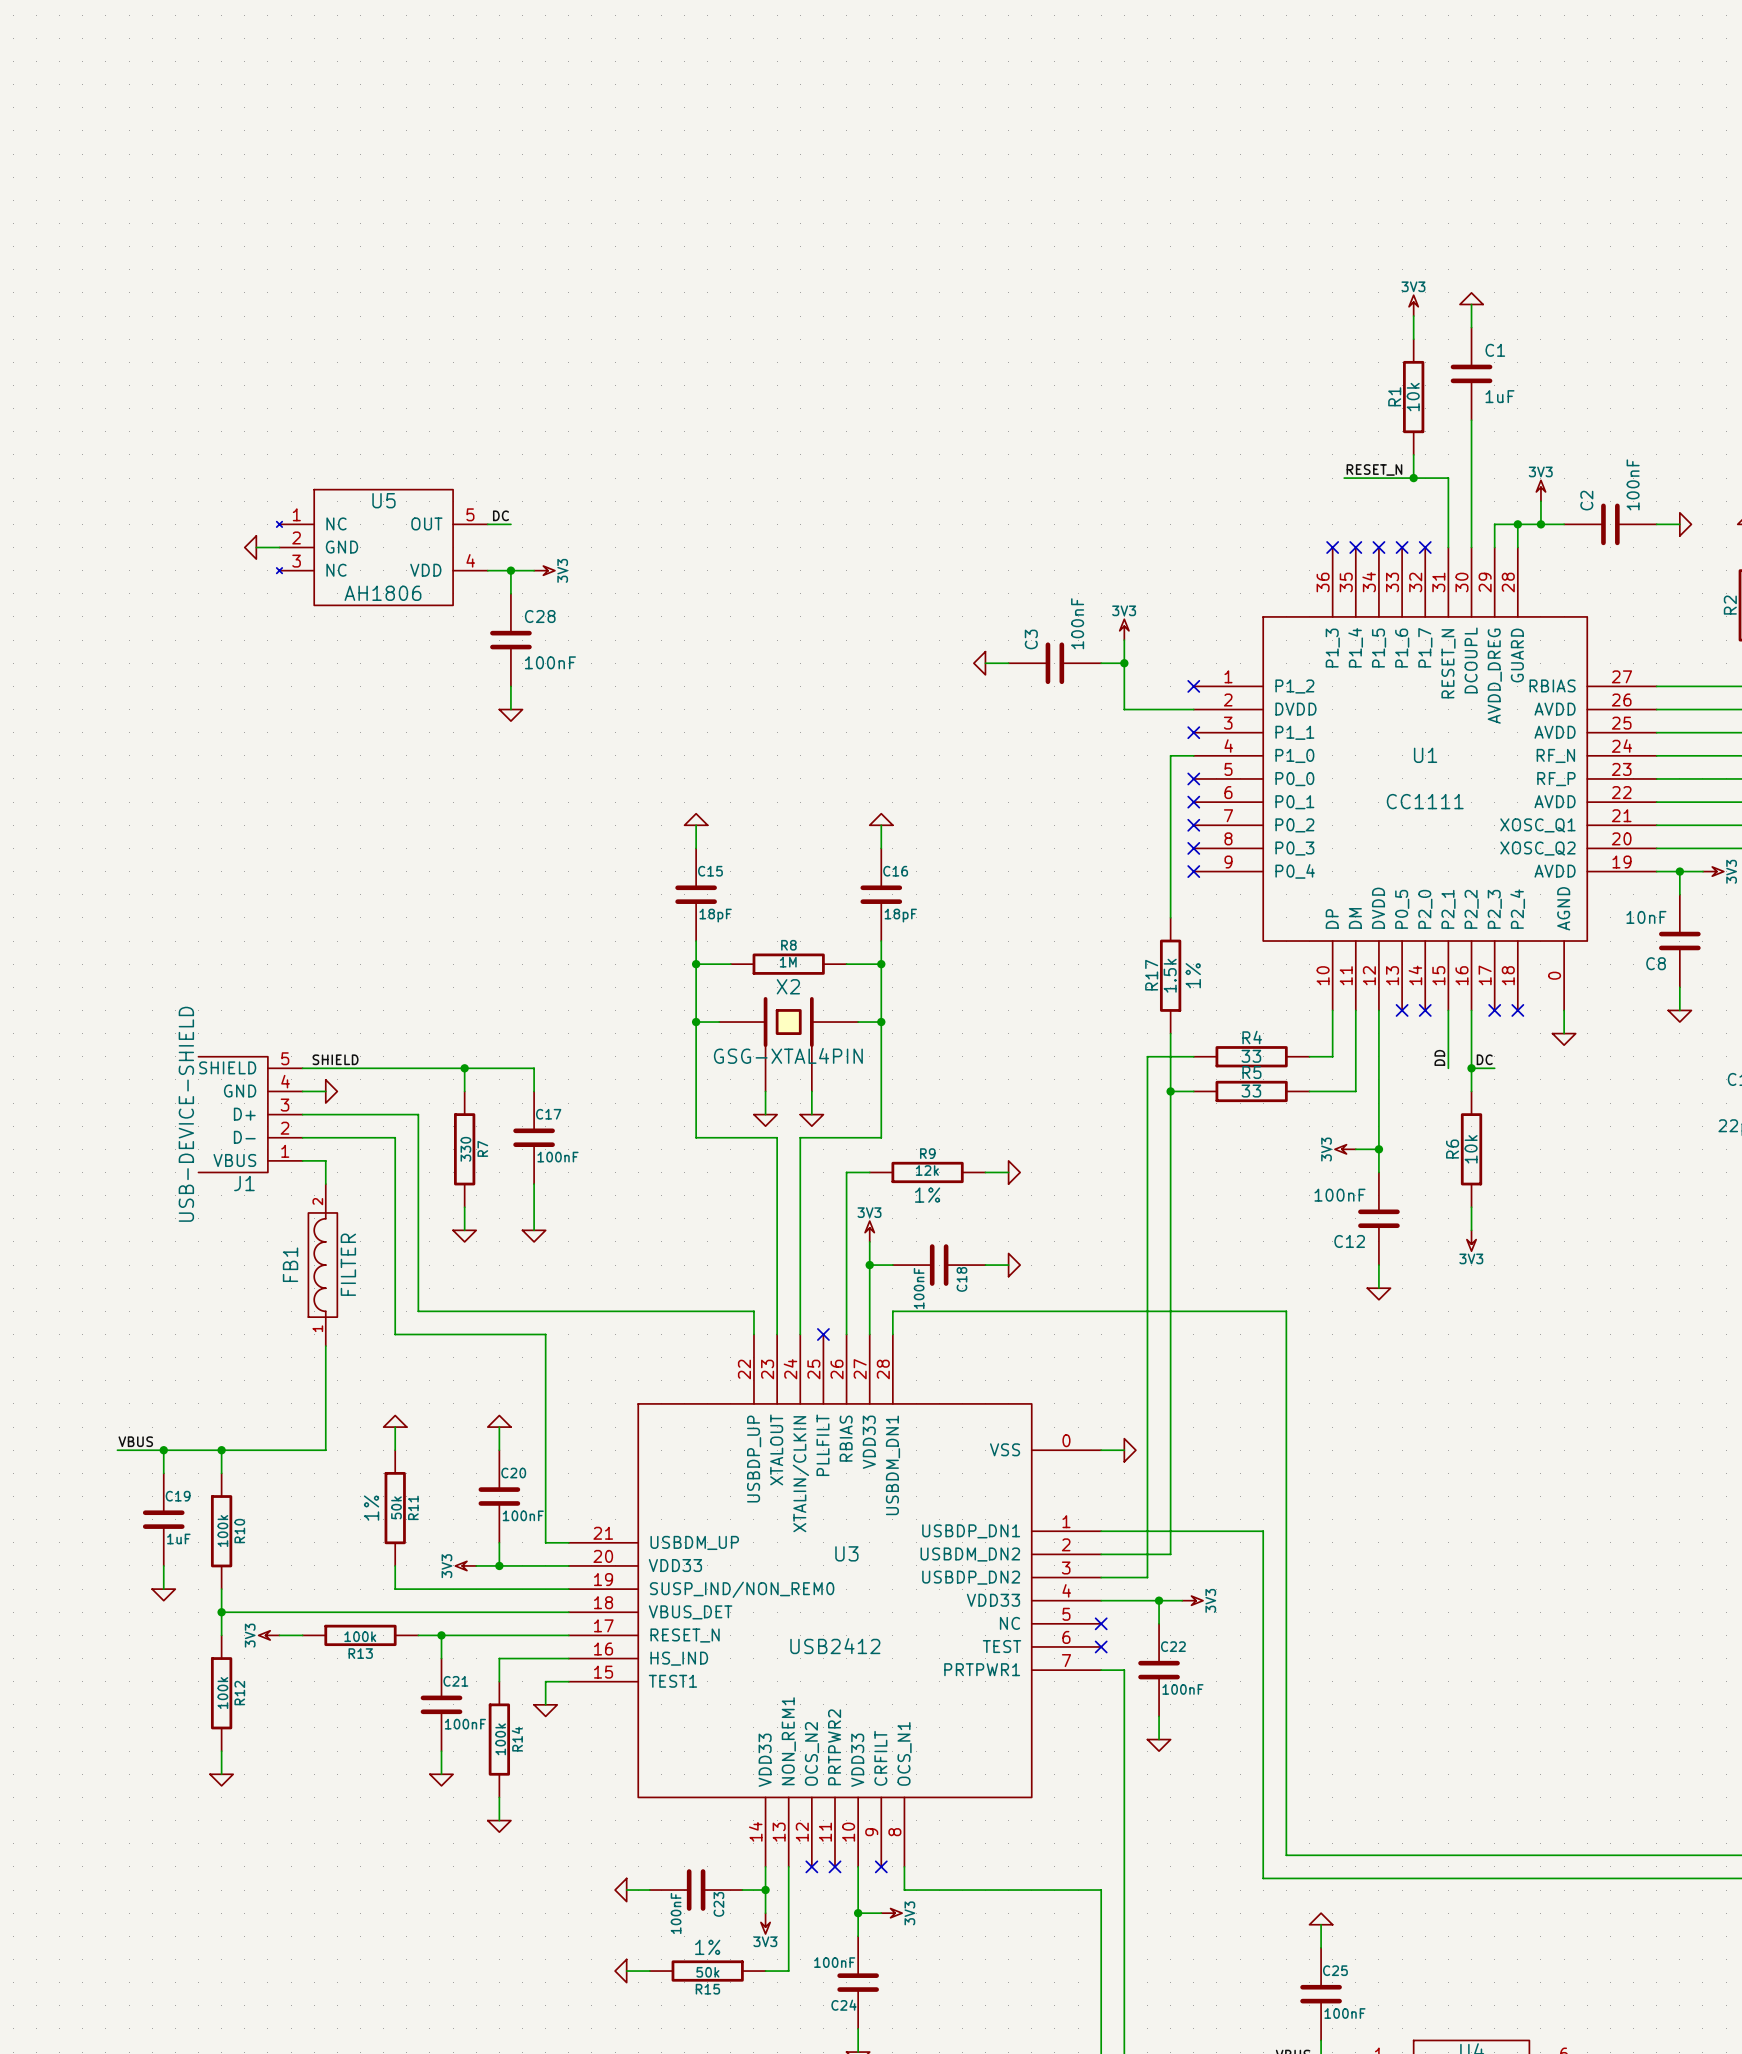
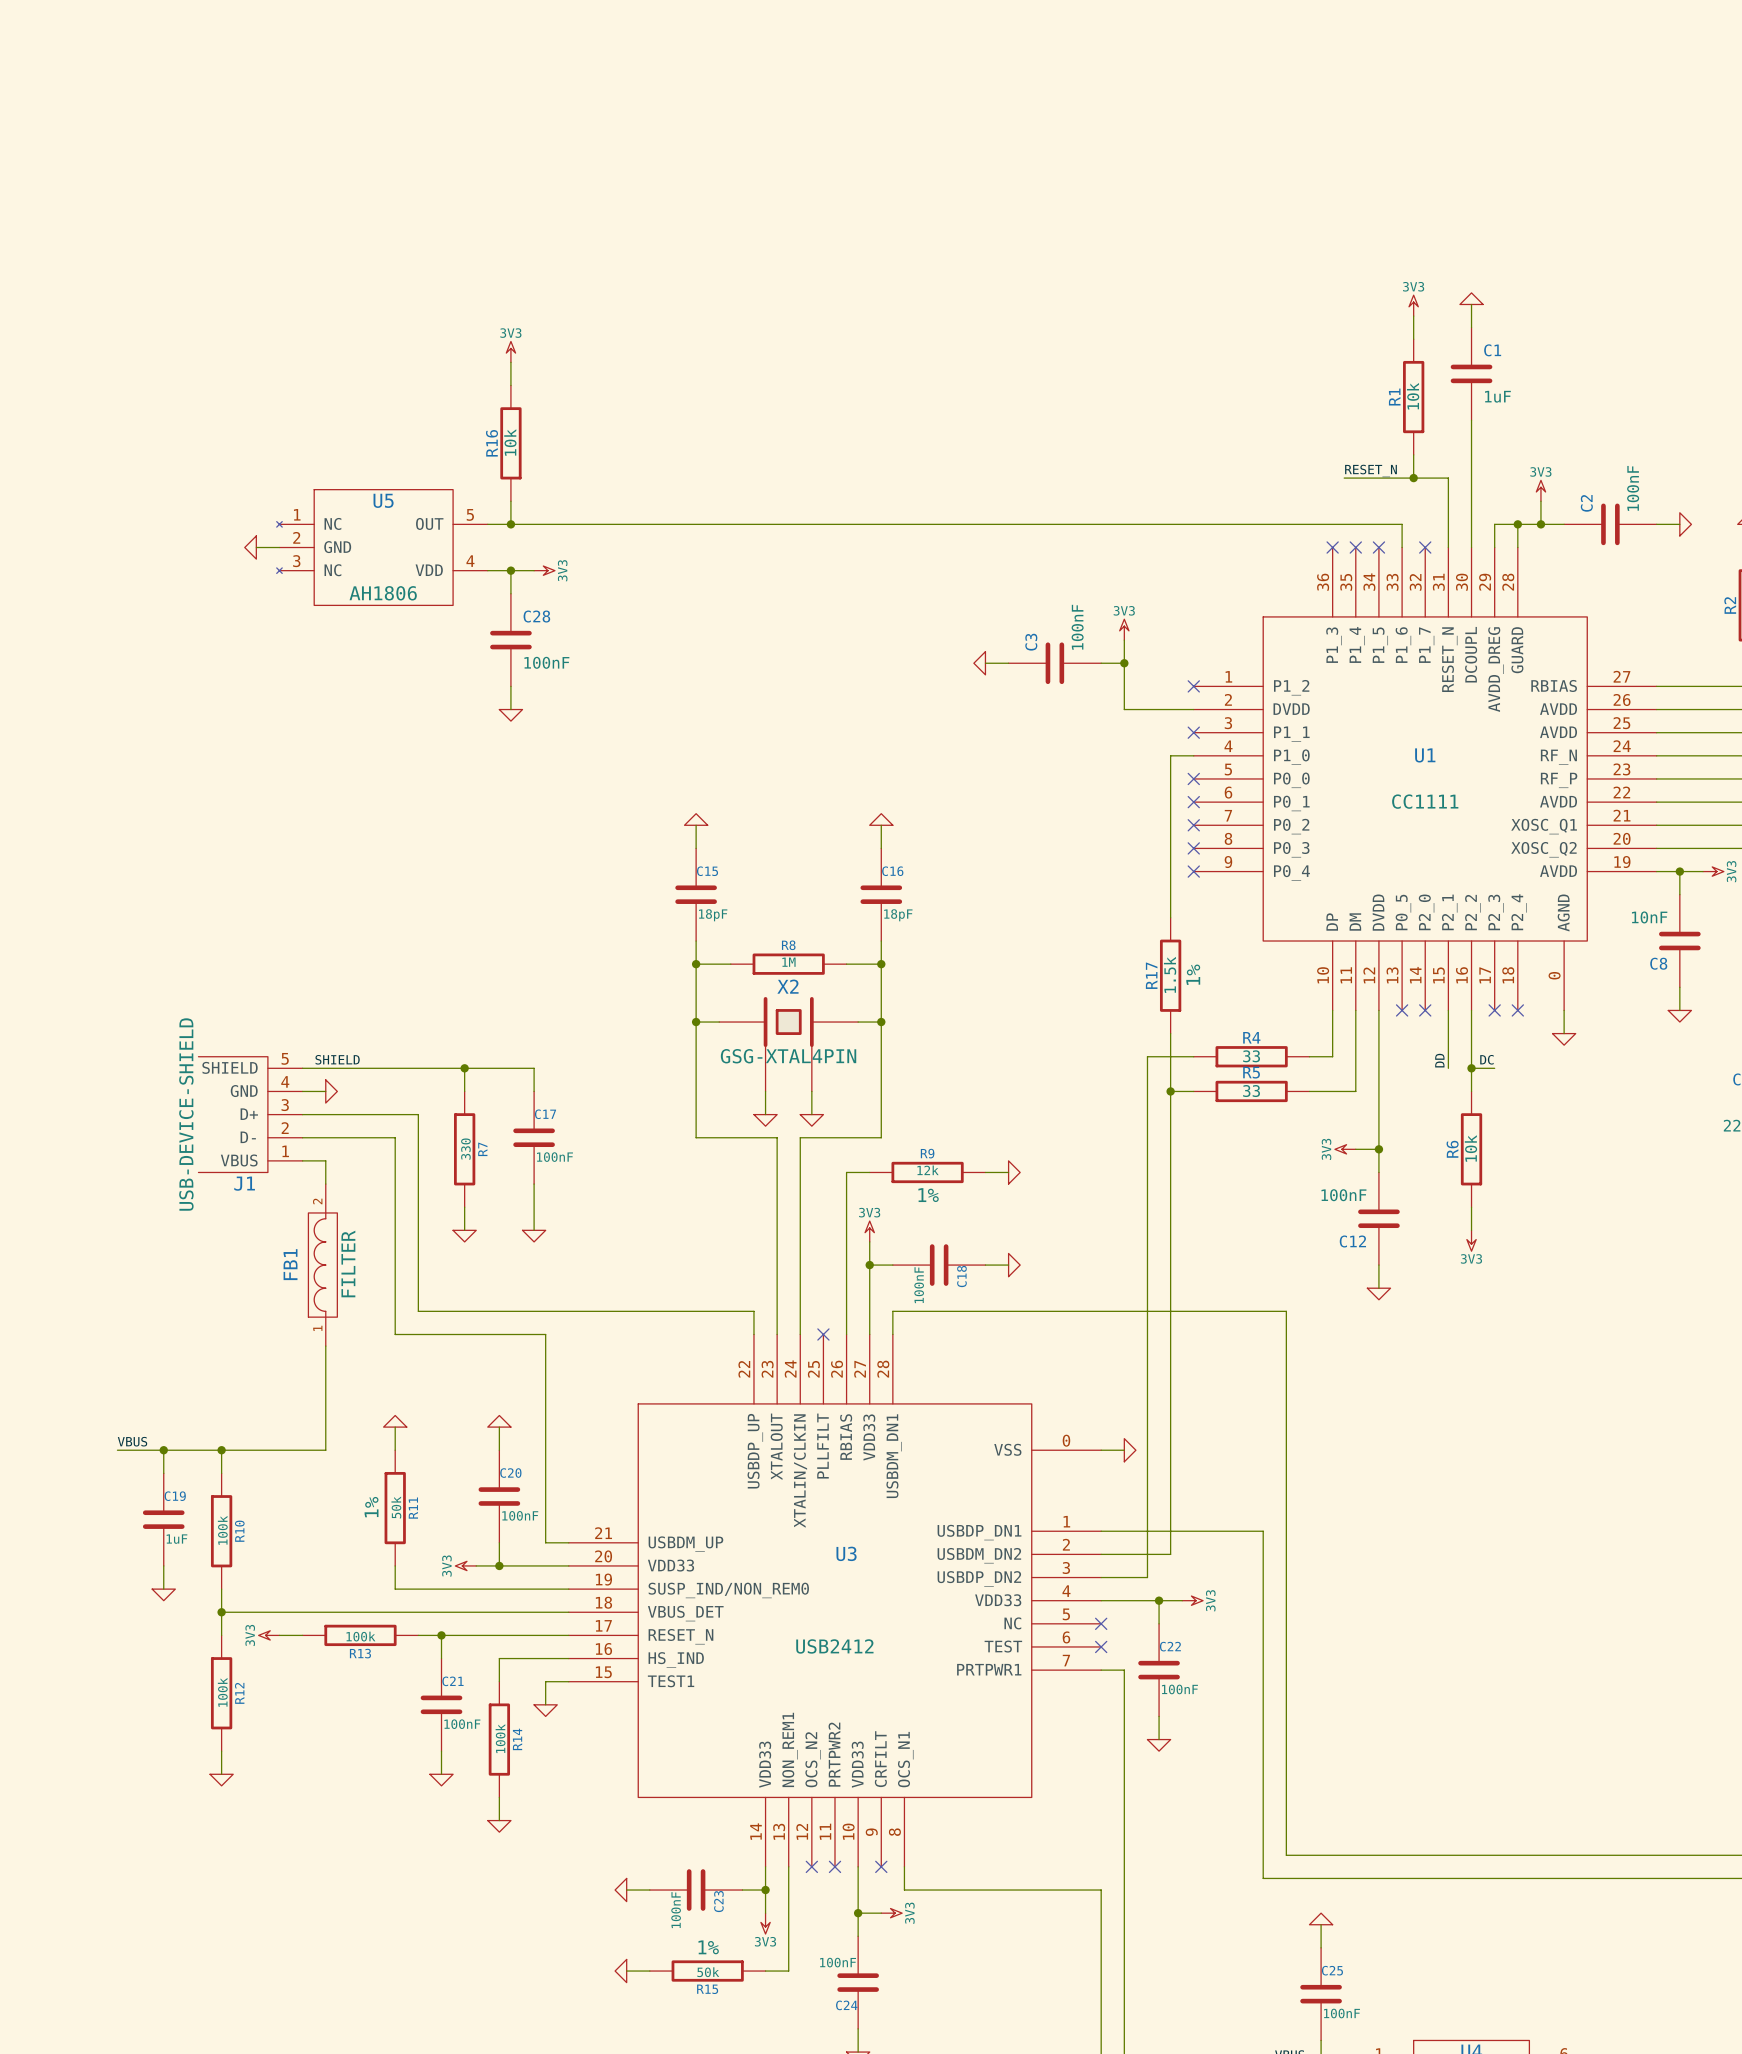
power symbol: none -> 3V3 (510, 351)
wire: none -> (510, 362) (510, 385)
R16: none -> 10k (510, 443)
wire: none -> (510, 501) (510, 524) (1402, 524) (1402, 547)
label: DC (500, 515) -> none
junction: none -> (510, 524)
no-connect mark: (1402, 547) -> none

